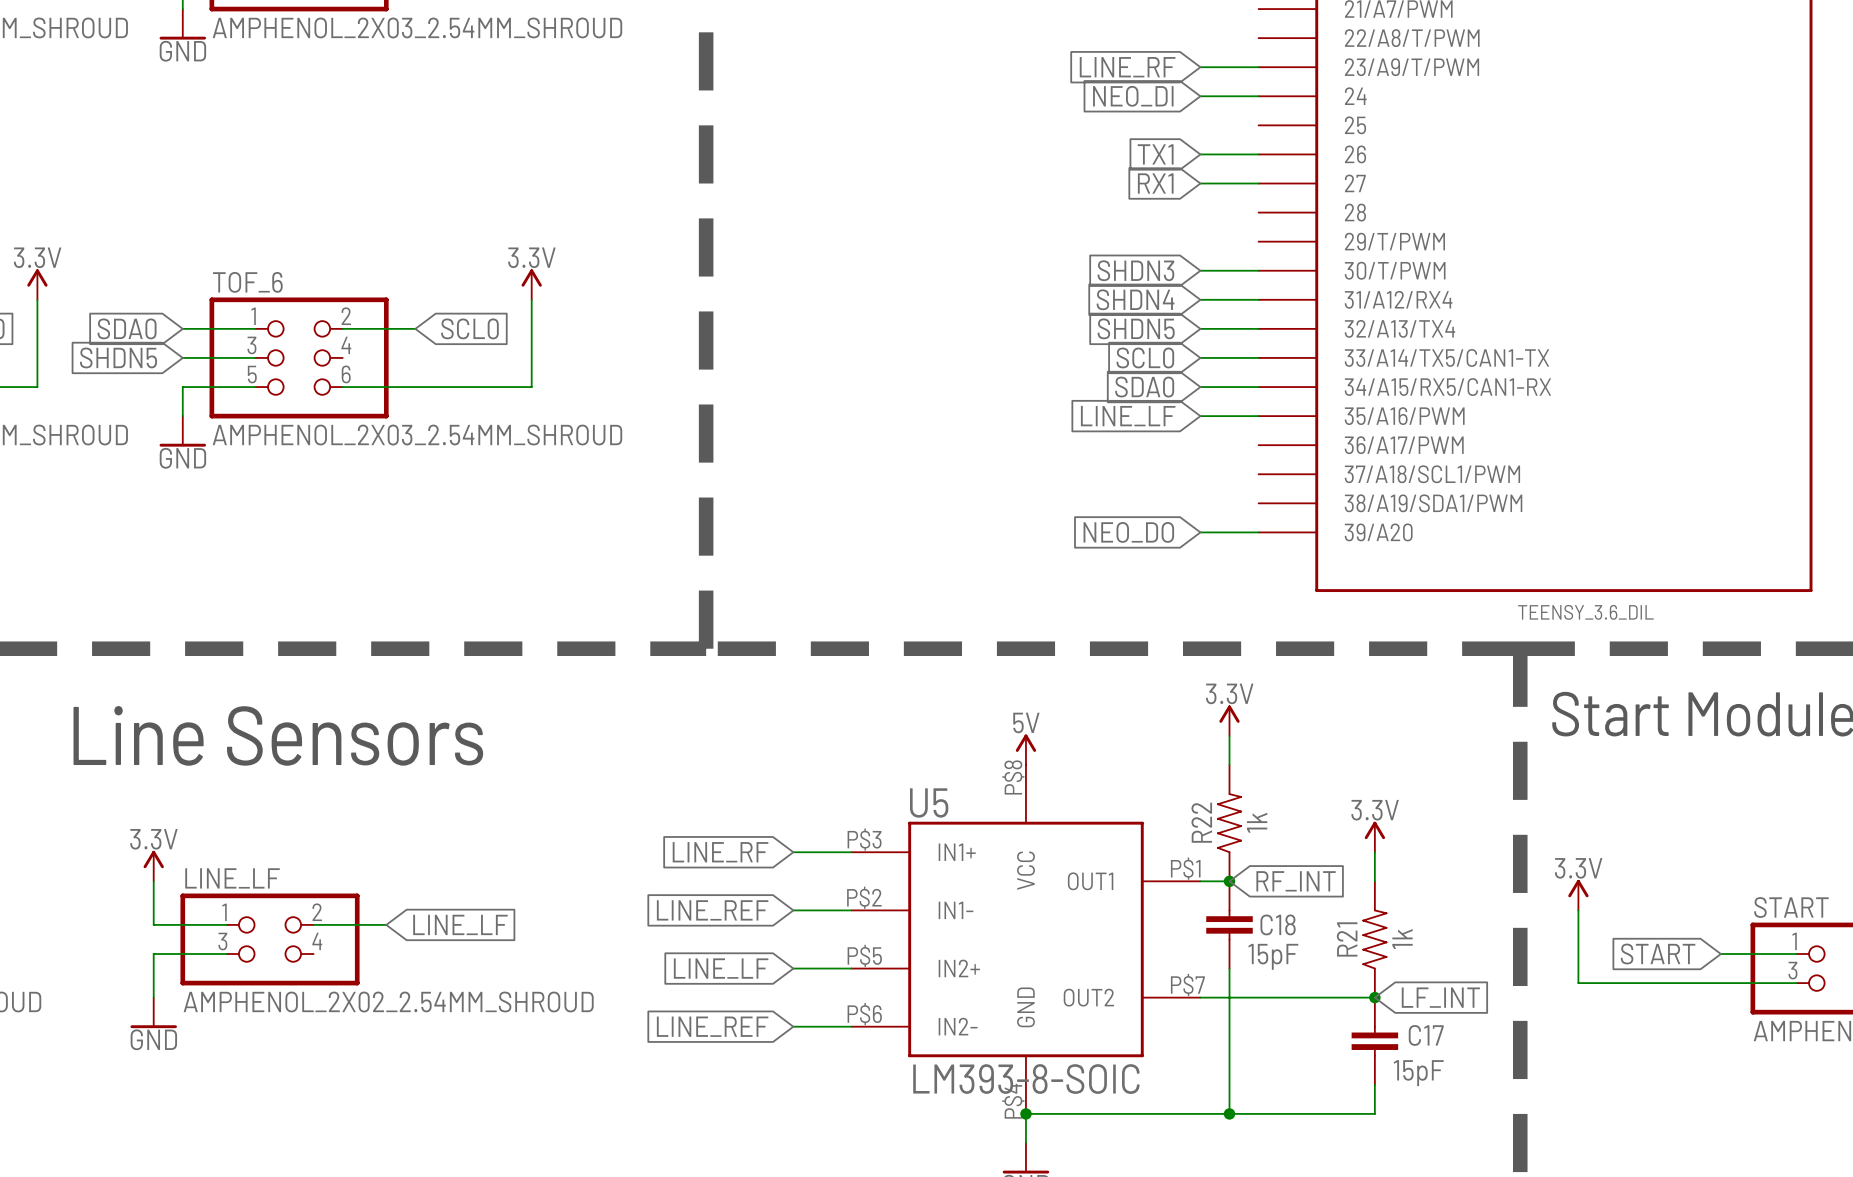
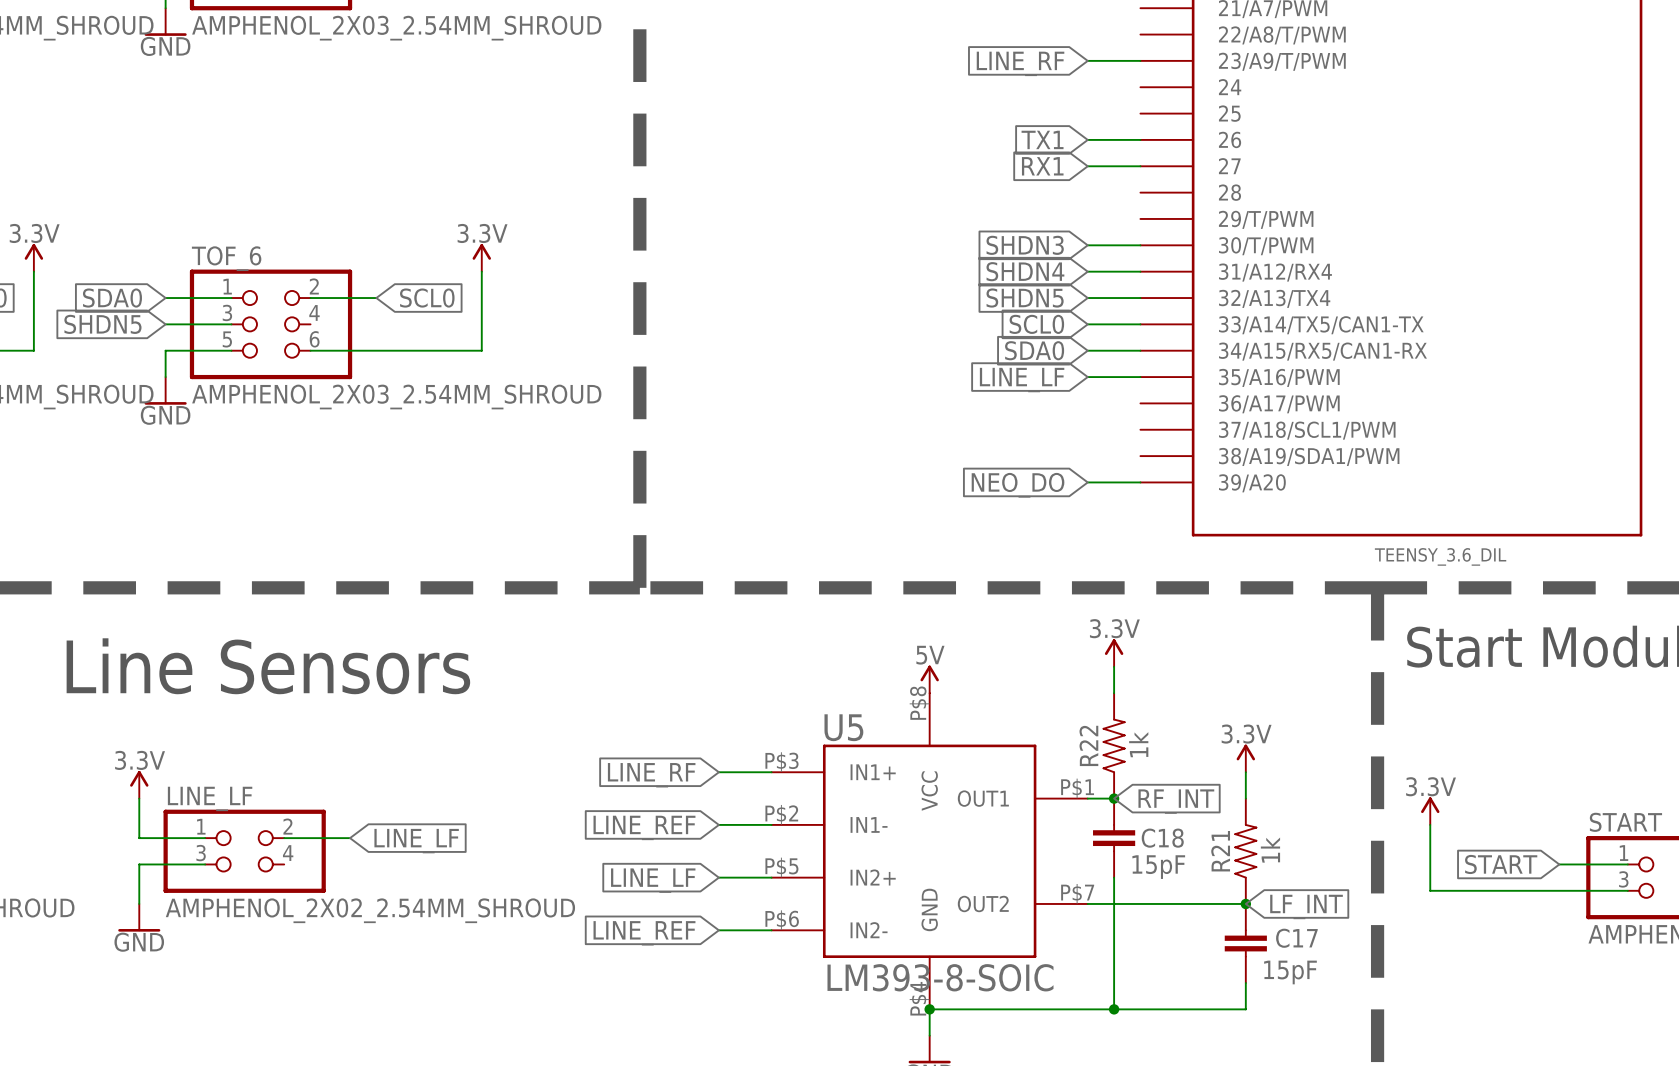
global label: NEO_DI (1133, 96) -> none
wire: (1200, 96) (1258, 96) -> none

